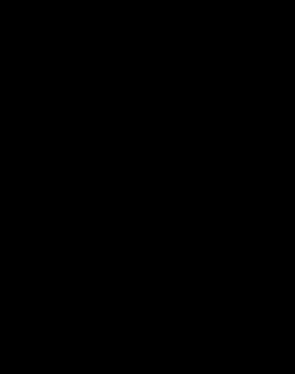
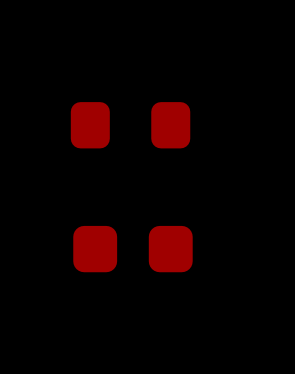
part: none -> (130, 125)
part: none -> (132, 249)

